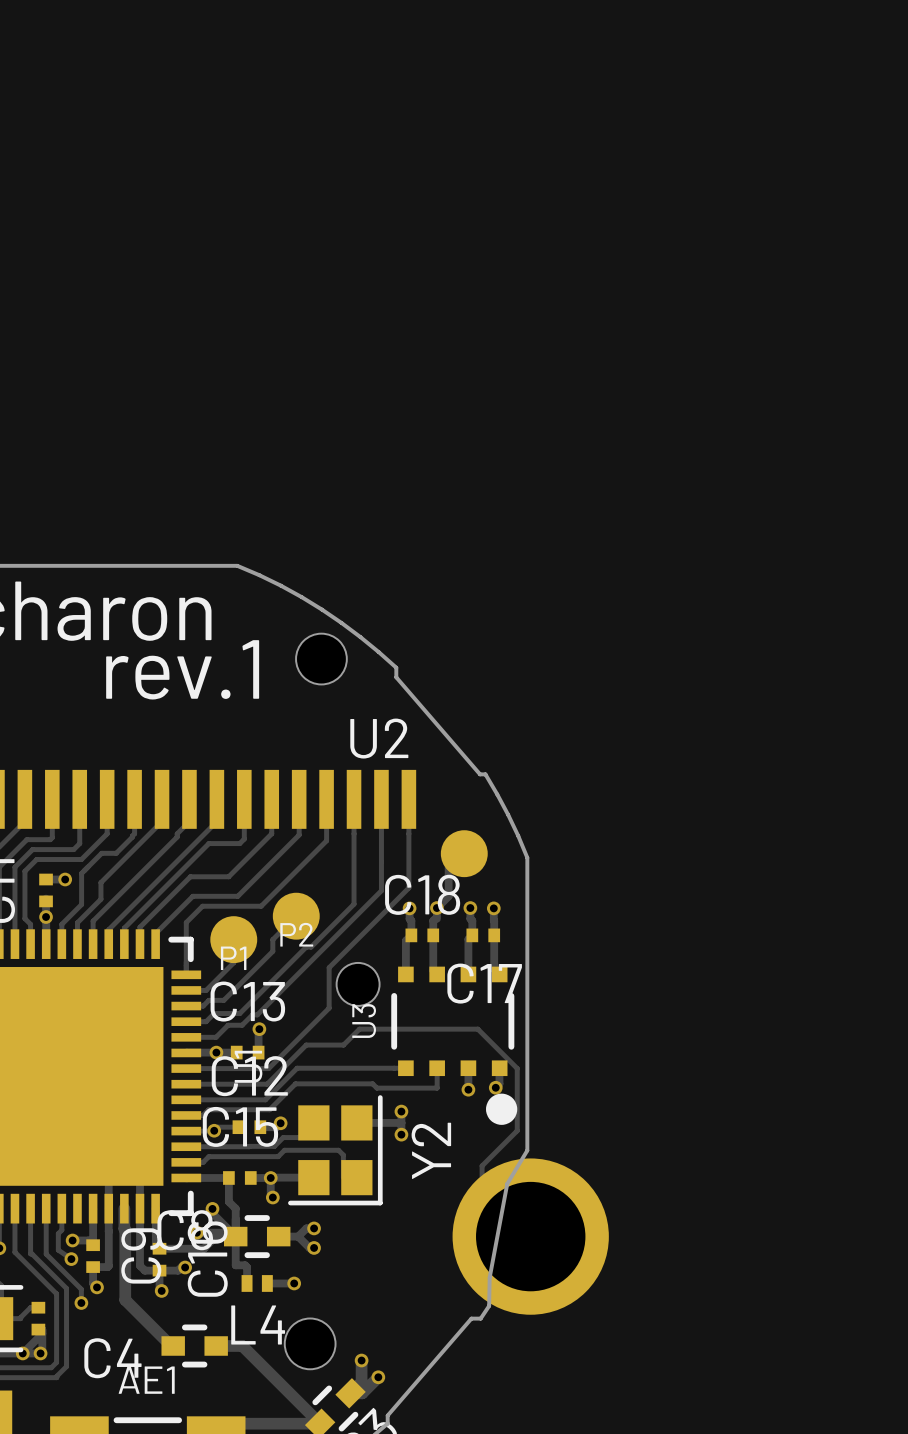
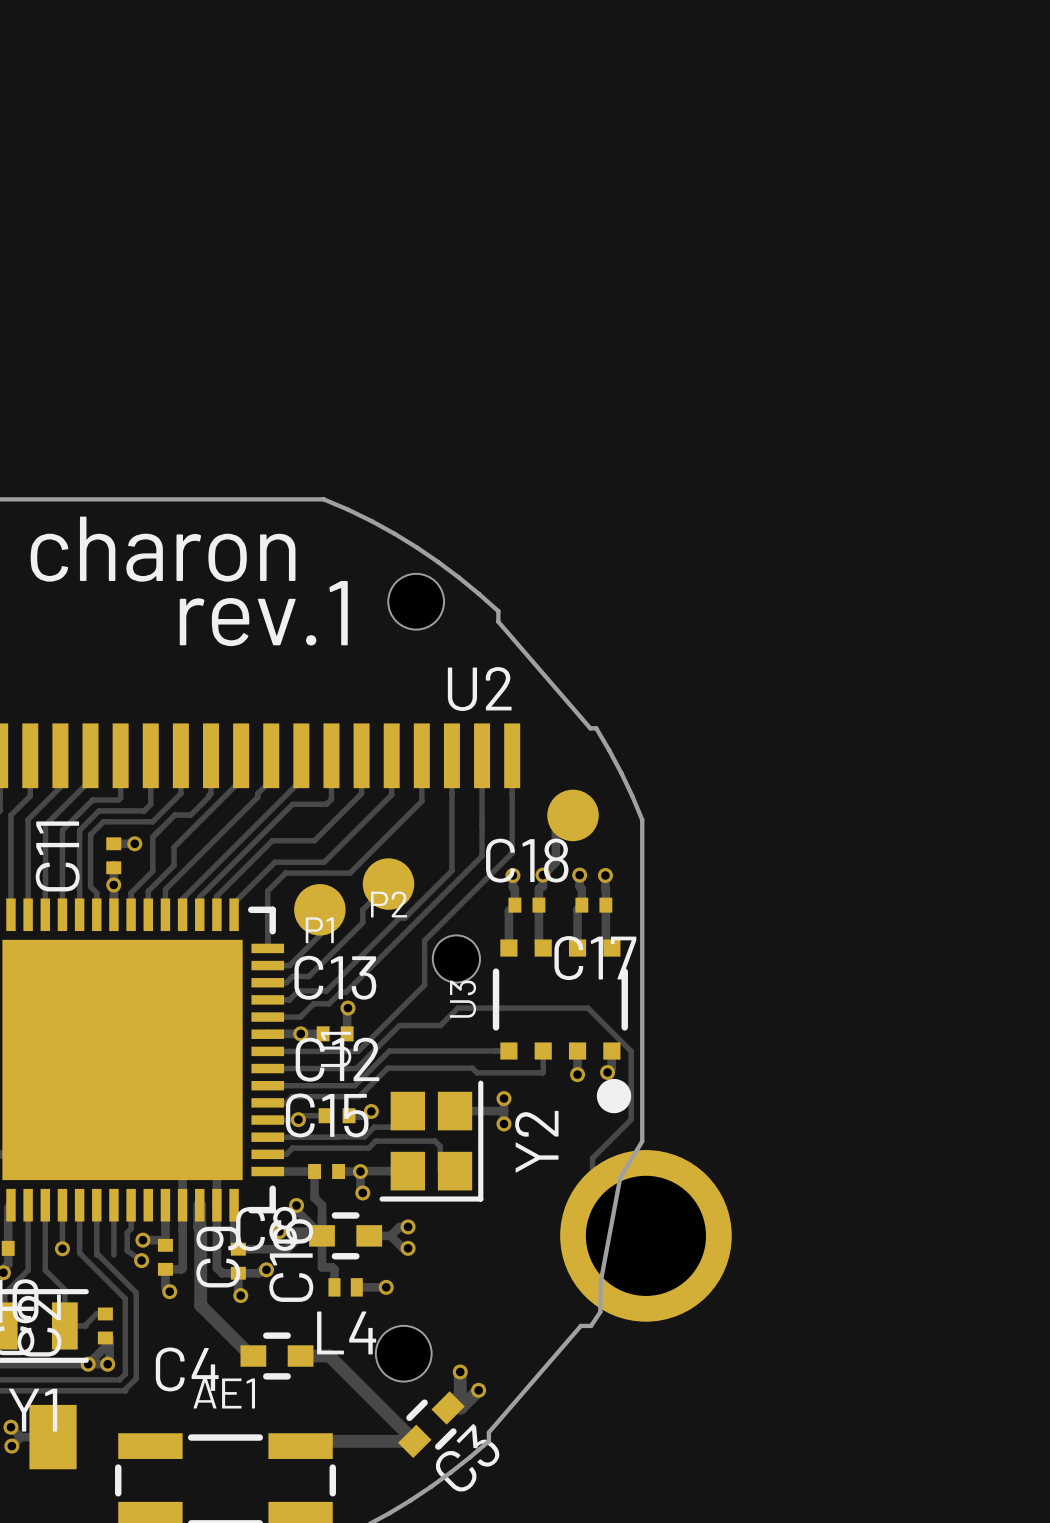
track: (46, 1254) (81, 1289) (81, 1303) -> none
via: (81, 1303) -> none

